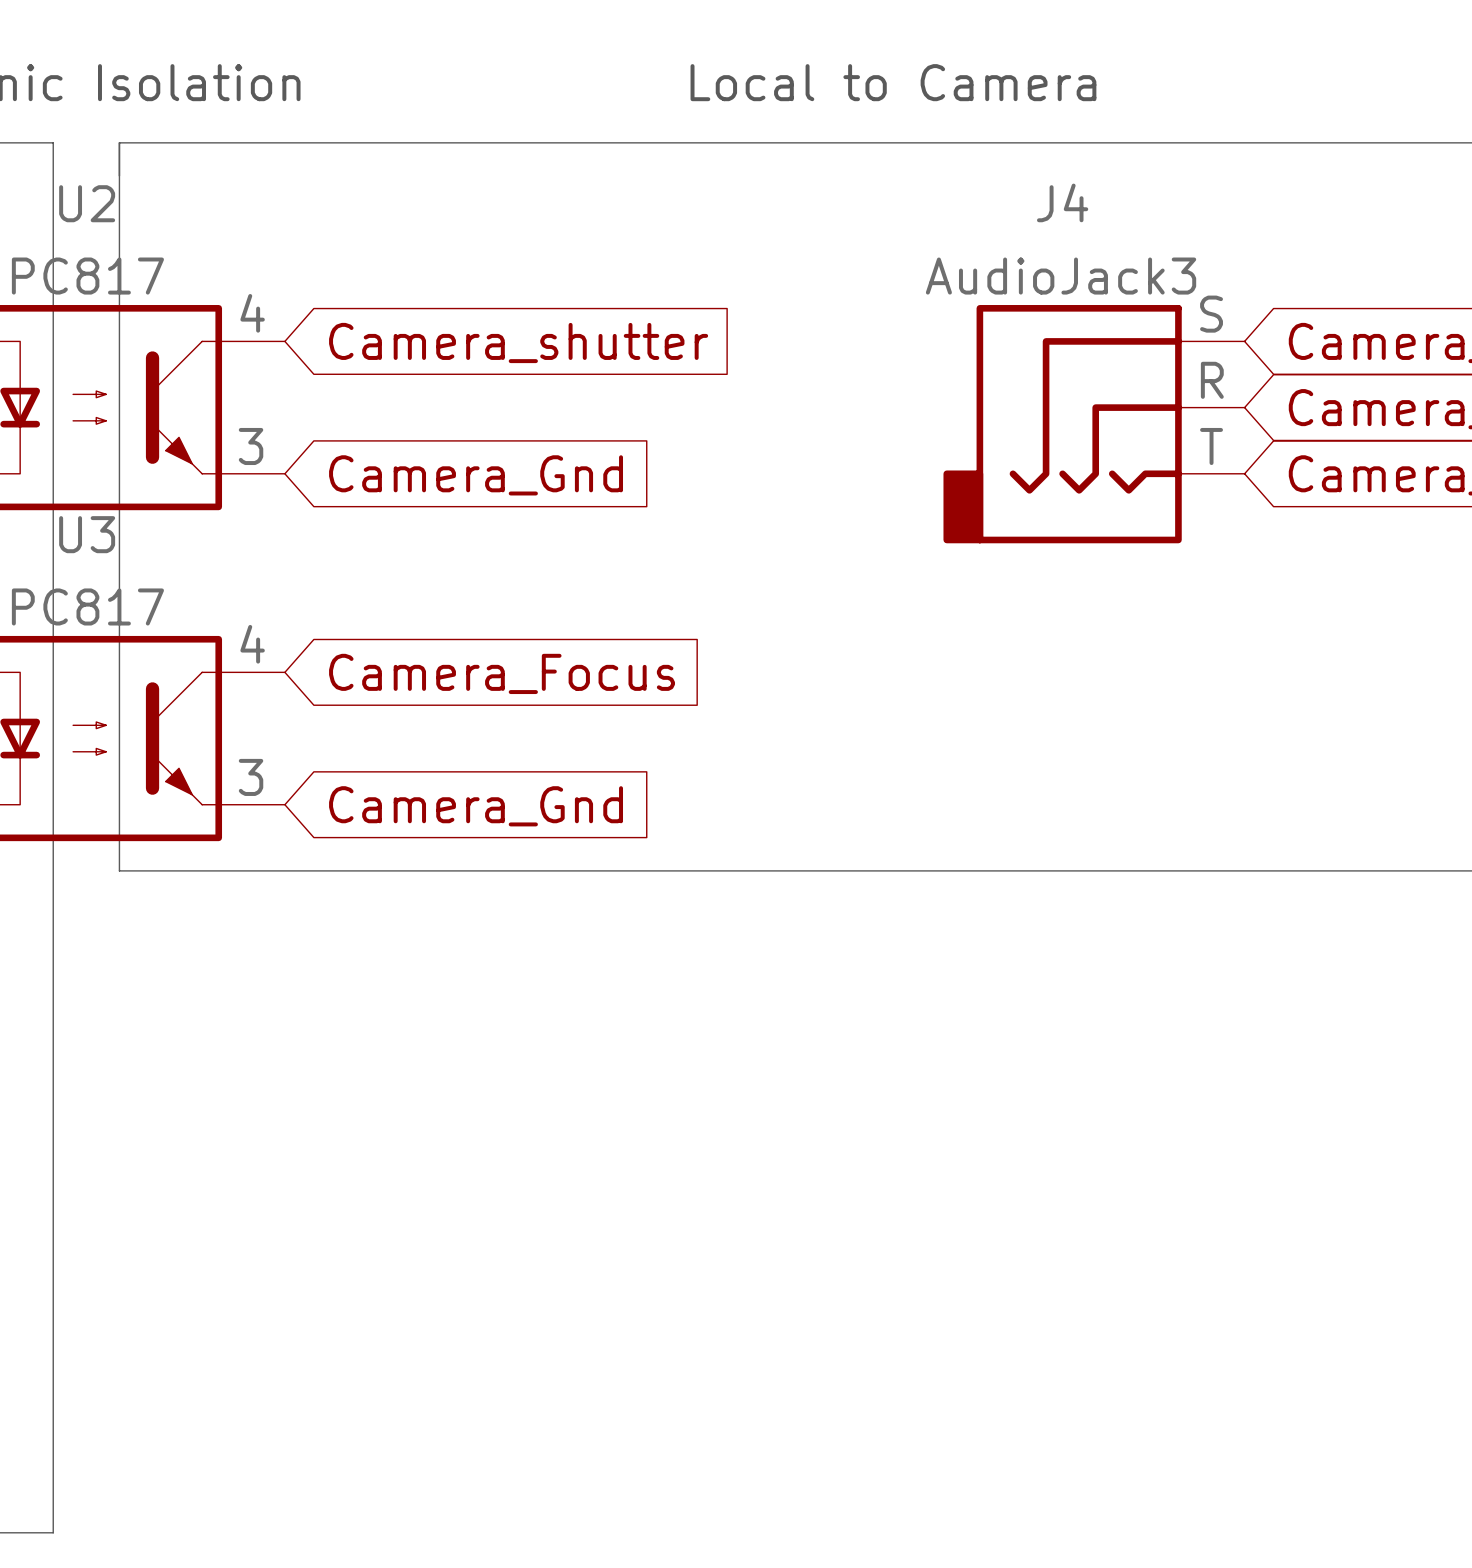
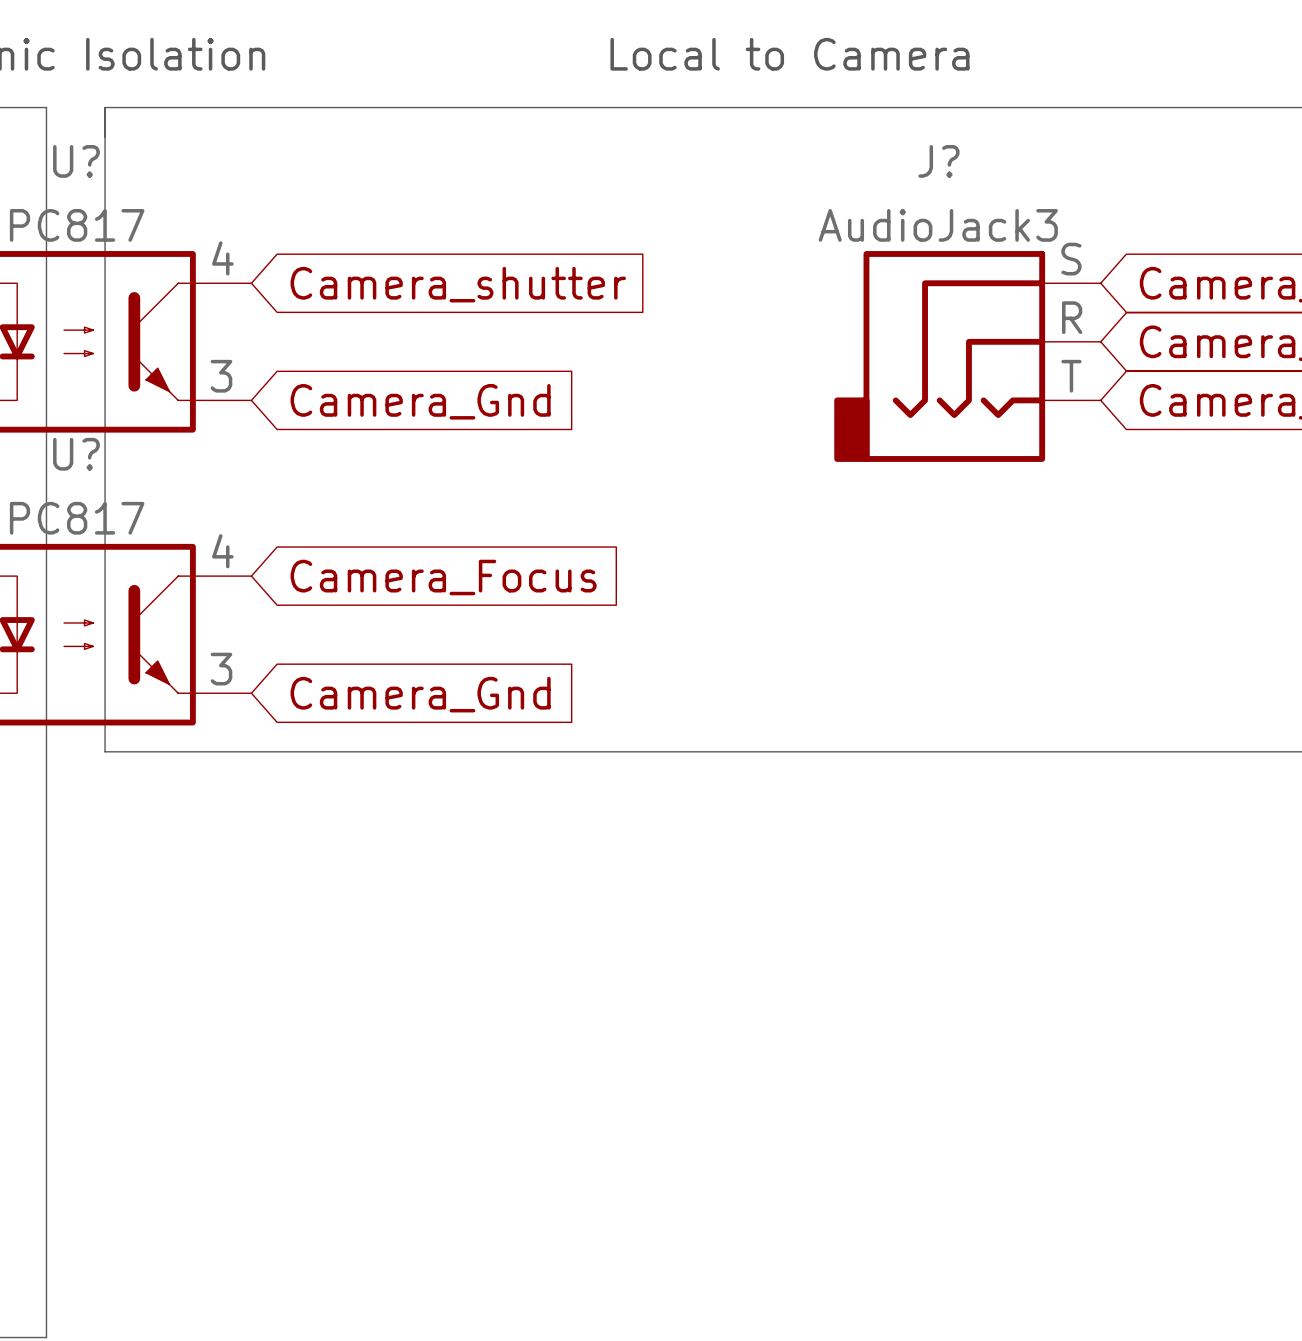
J4 name: J4 (1062, 202) -> J? (938, 161)
U2 name: U2 (87, 203) -> U? (76, 161)
U3 name: U3 (87, 534) -> U? (76, 454)

